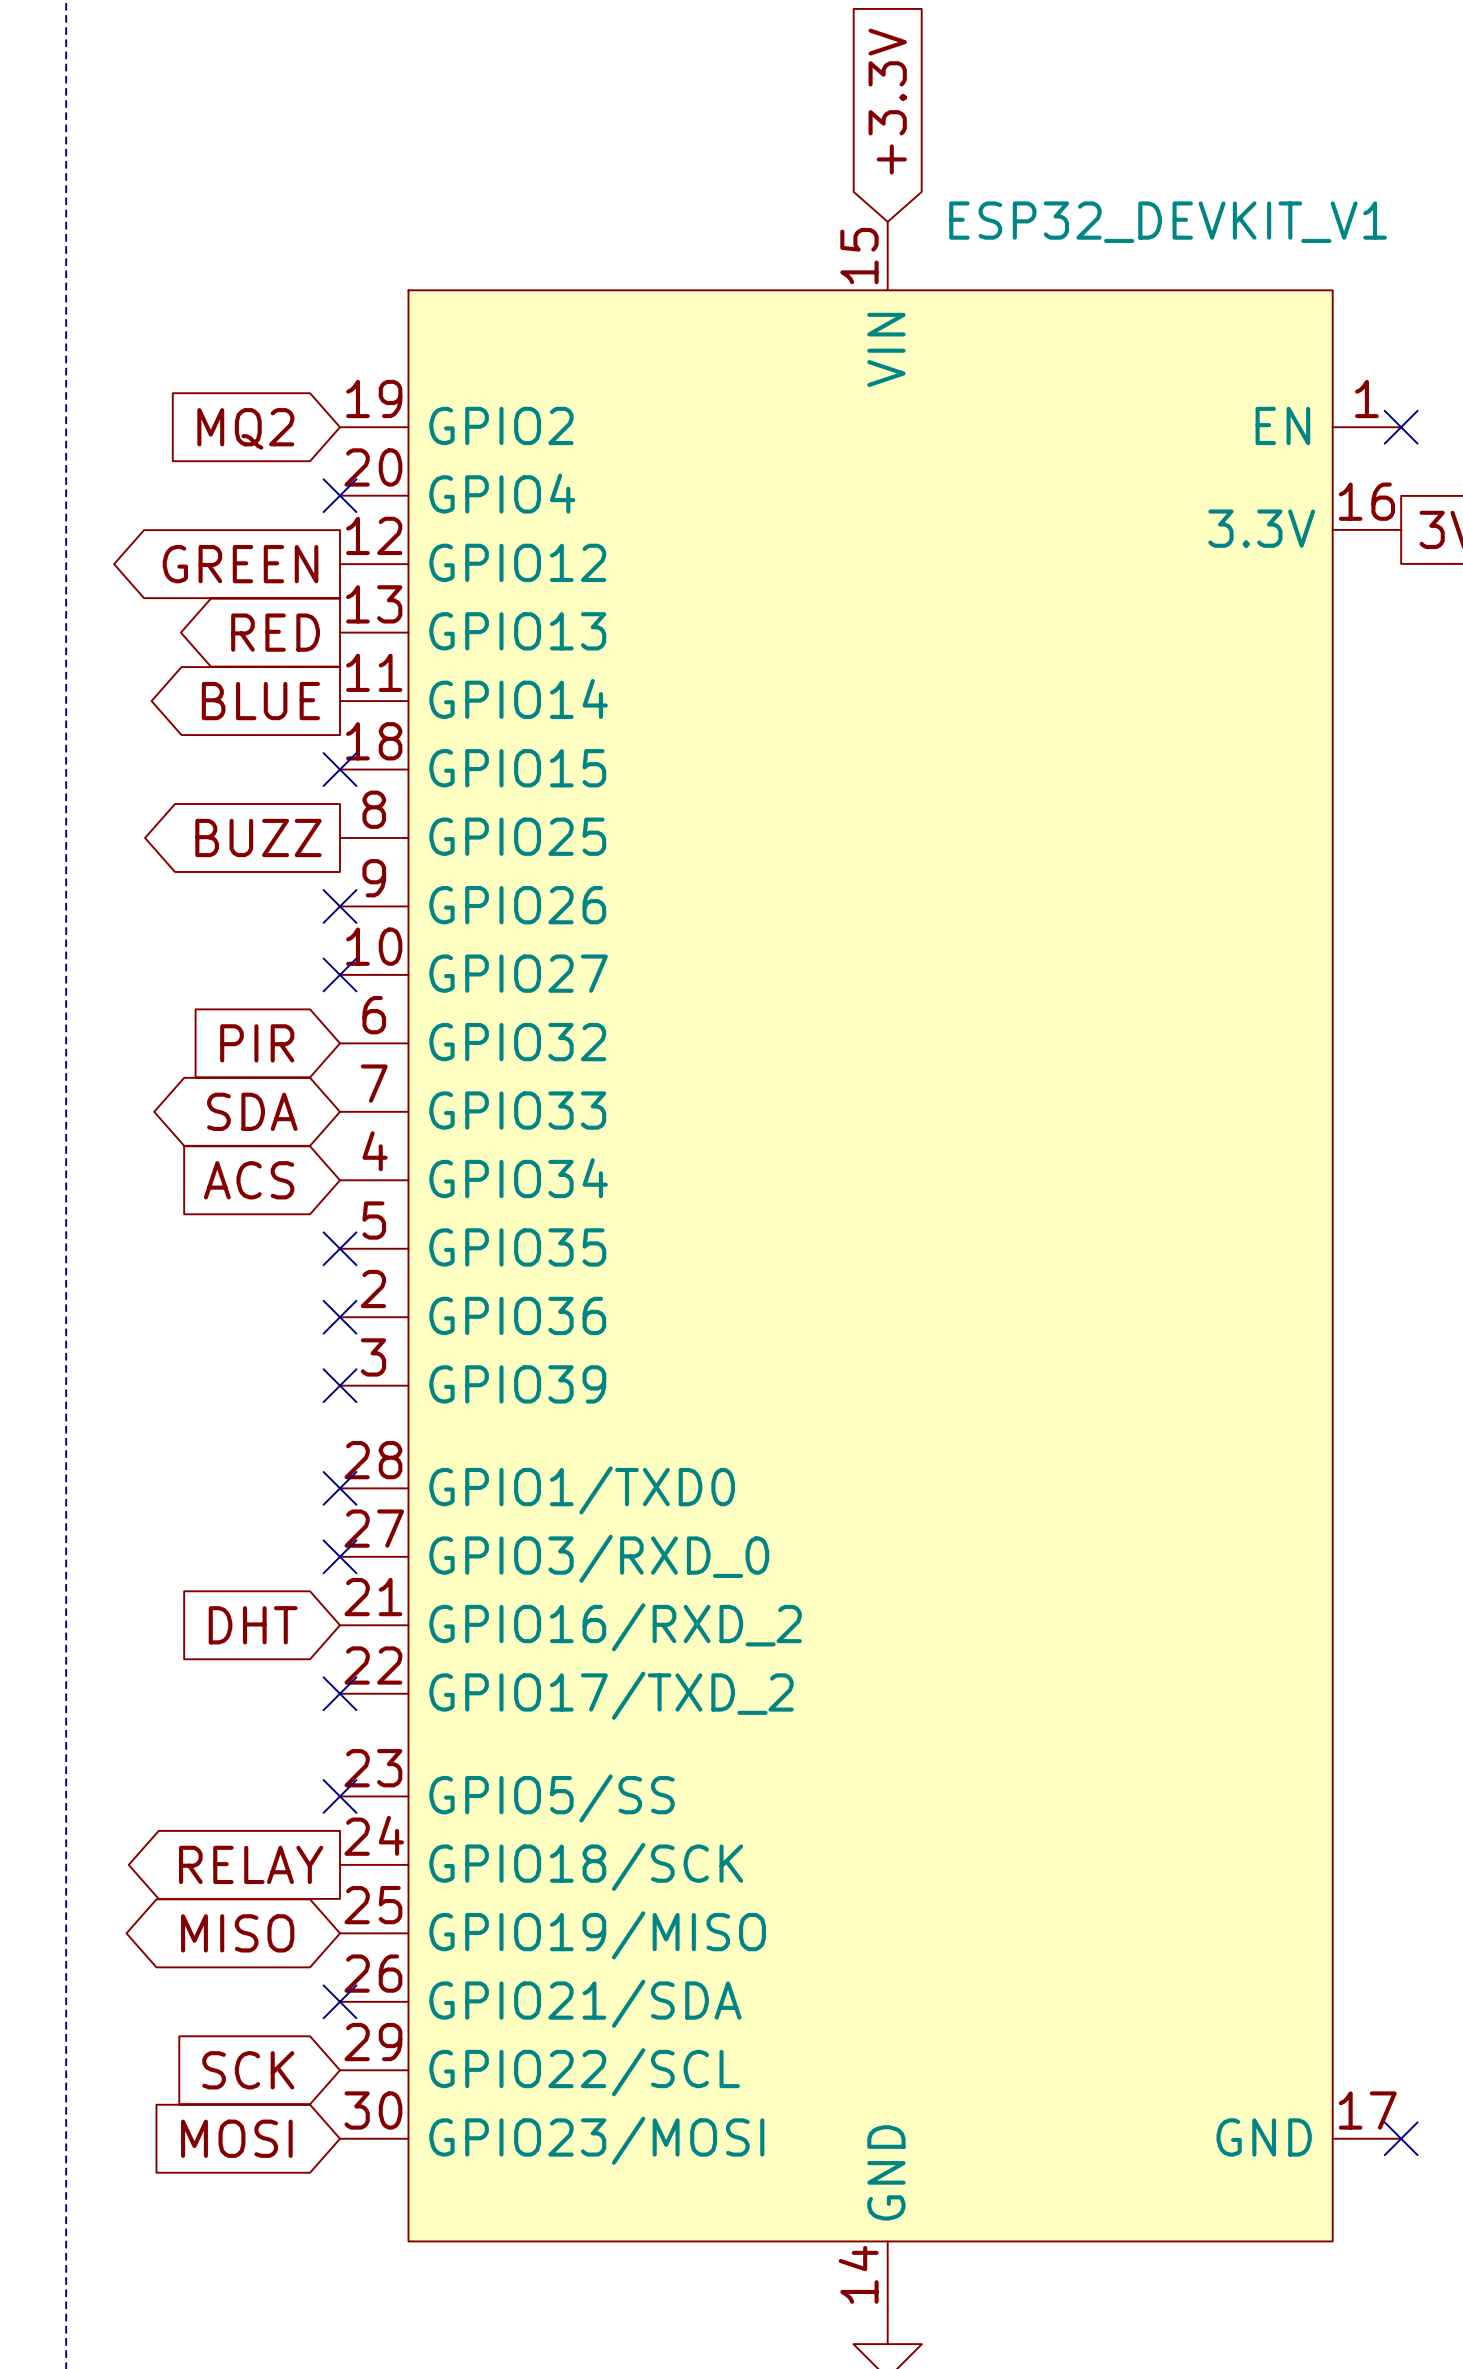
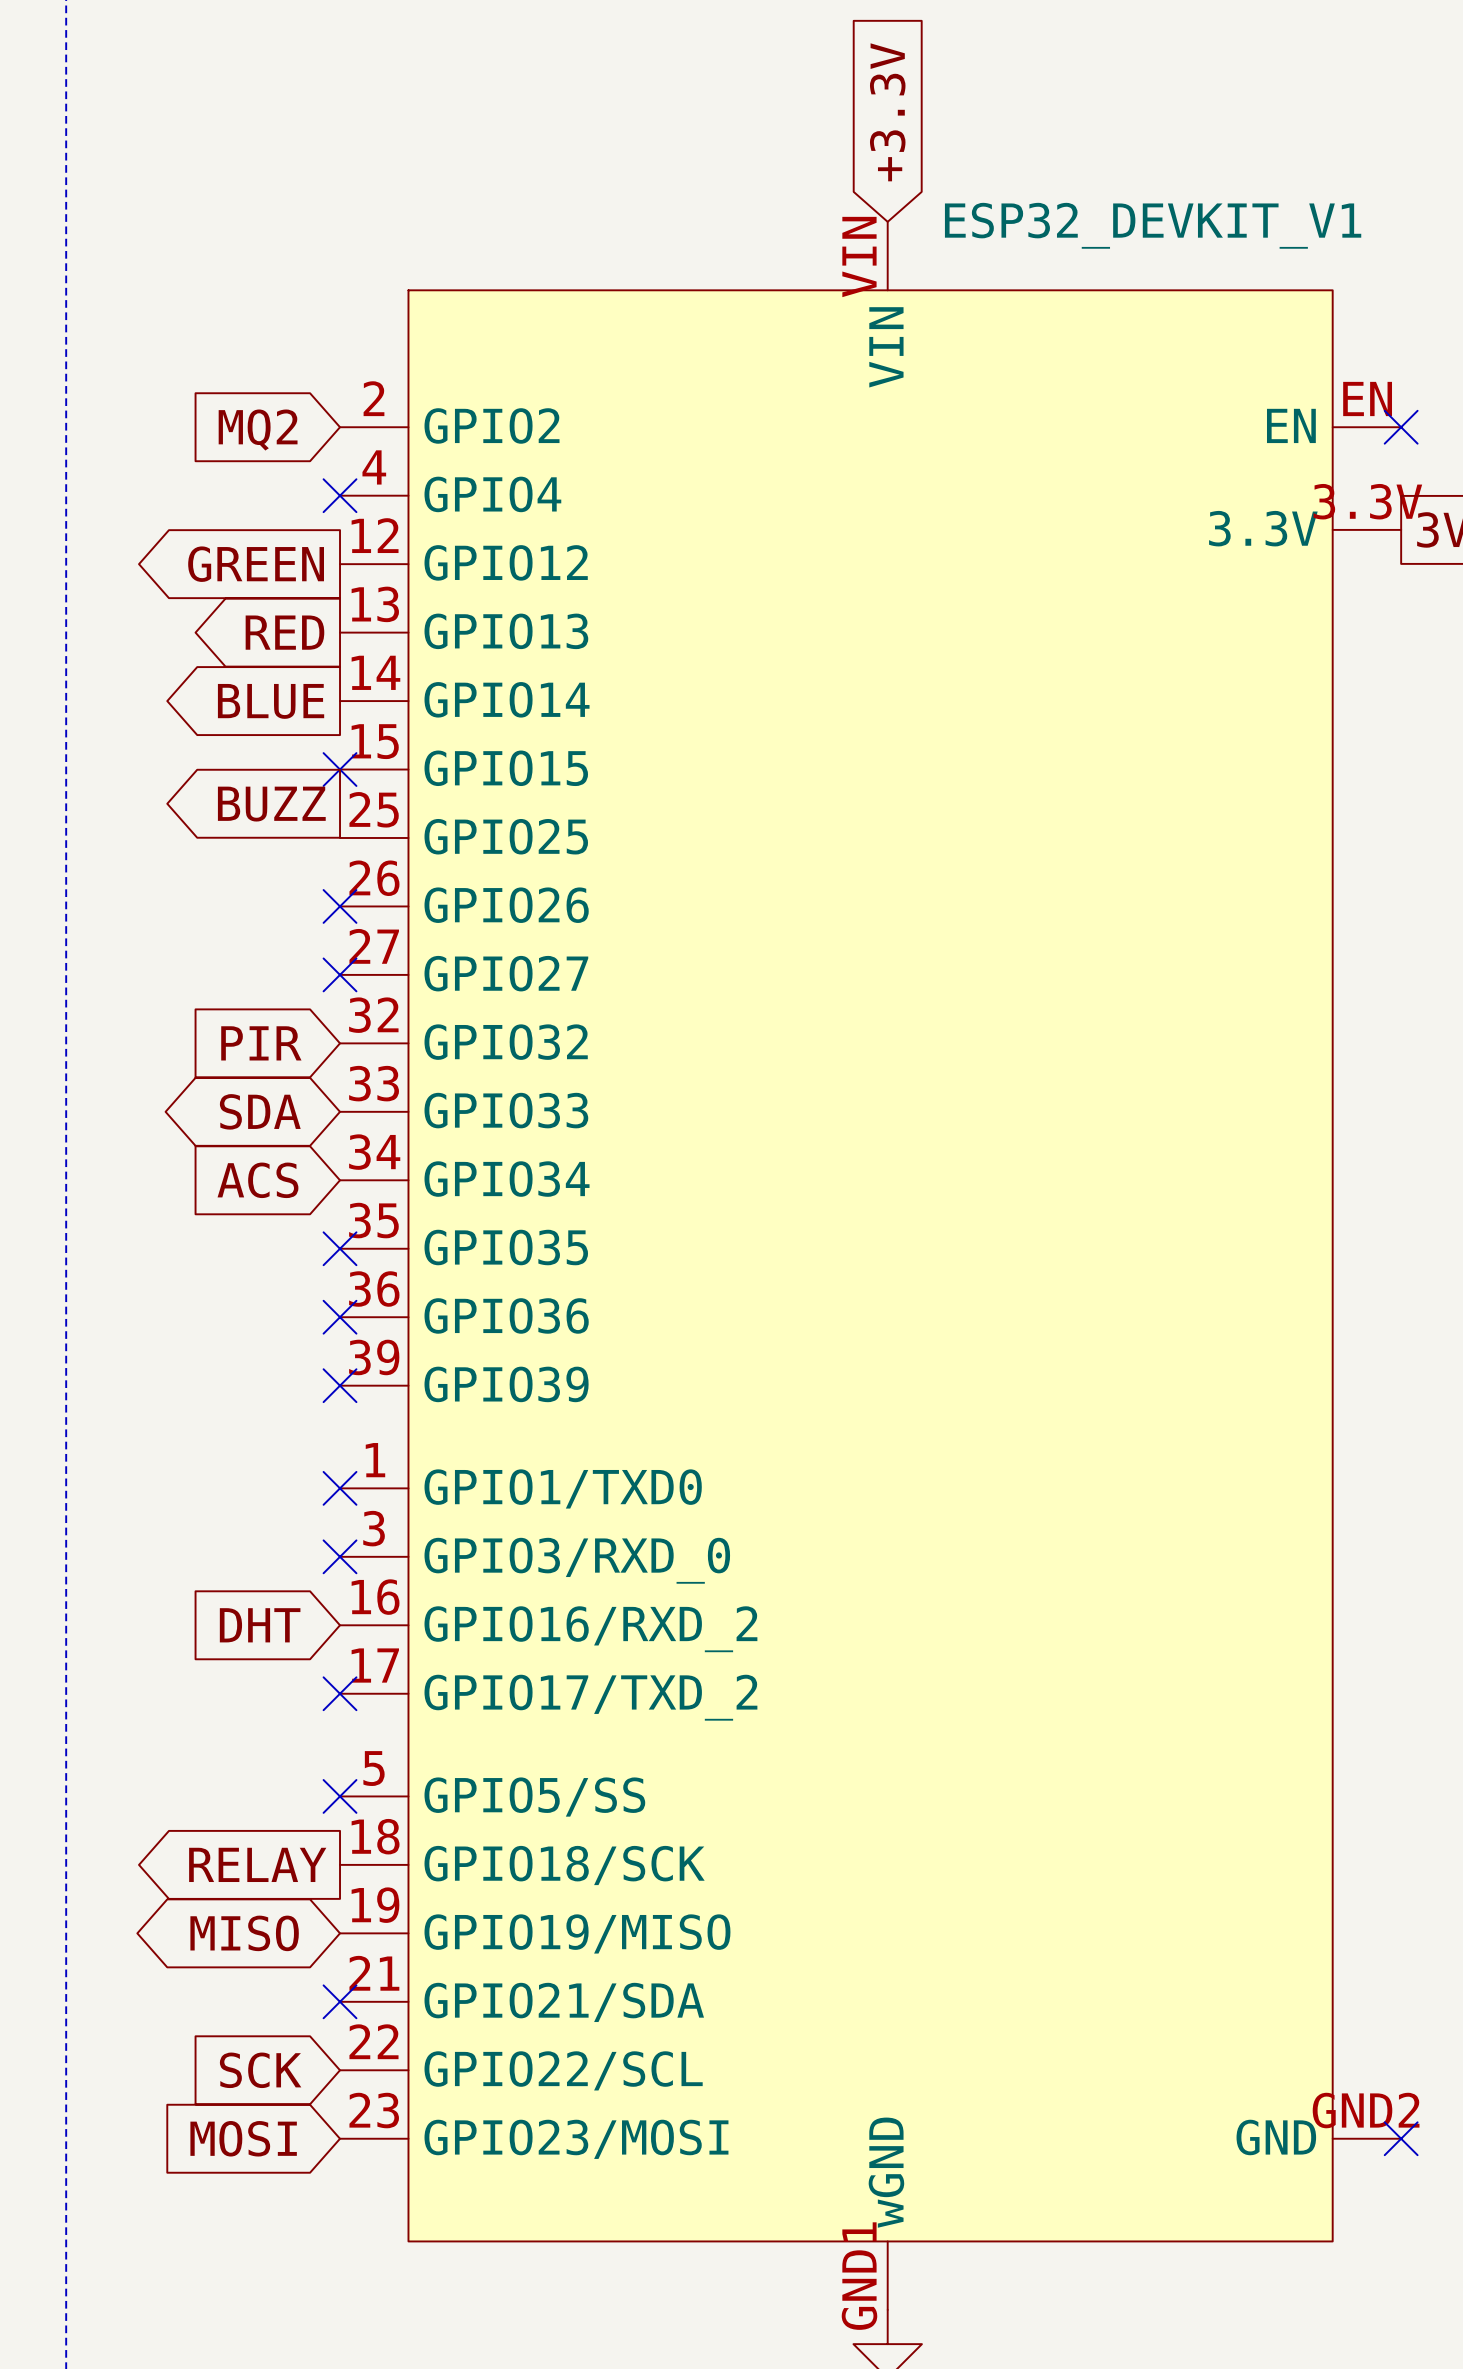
ESP32_DEVKIT_V1 symbol: [340, 221, 1402, 2310] -> [340, 221, 1402, 2310]
global label position: BUZZ (258, 837) -> BUZZ (271, 804)

